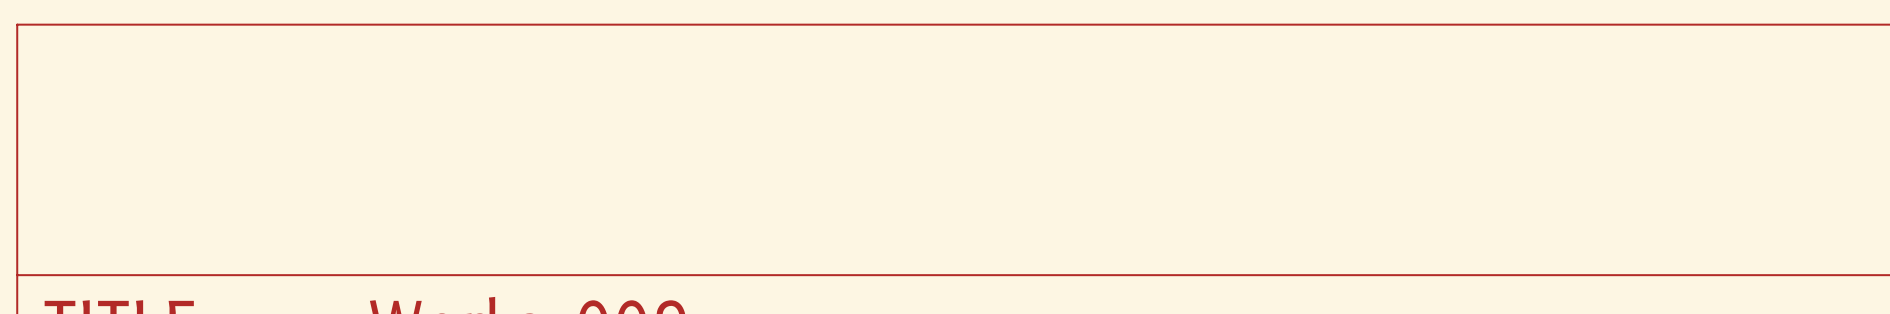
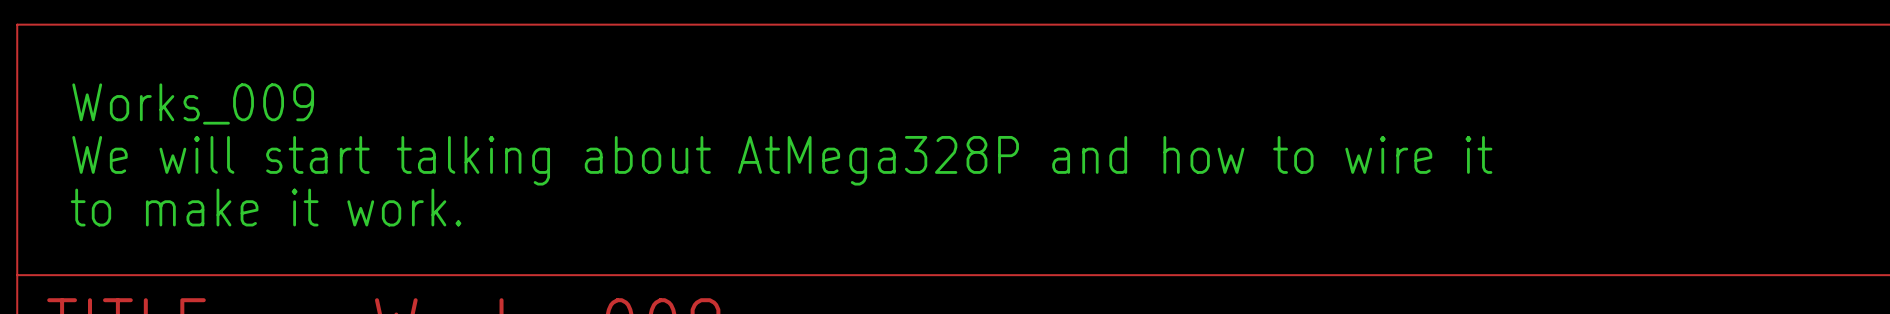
text: none -> Works_009 (193, 103)
text: none -> We will start talking about AtMega328P and how to wire it (782, 160)
text: none -> to make it work. (266, 207)

